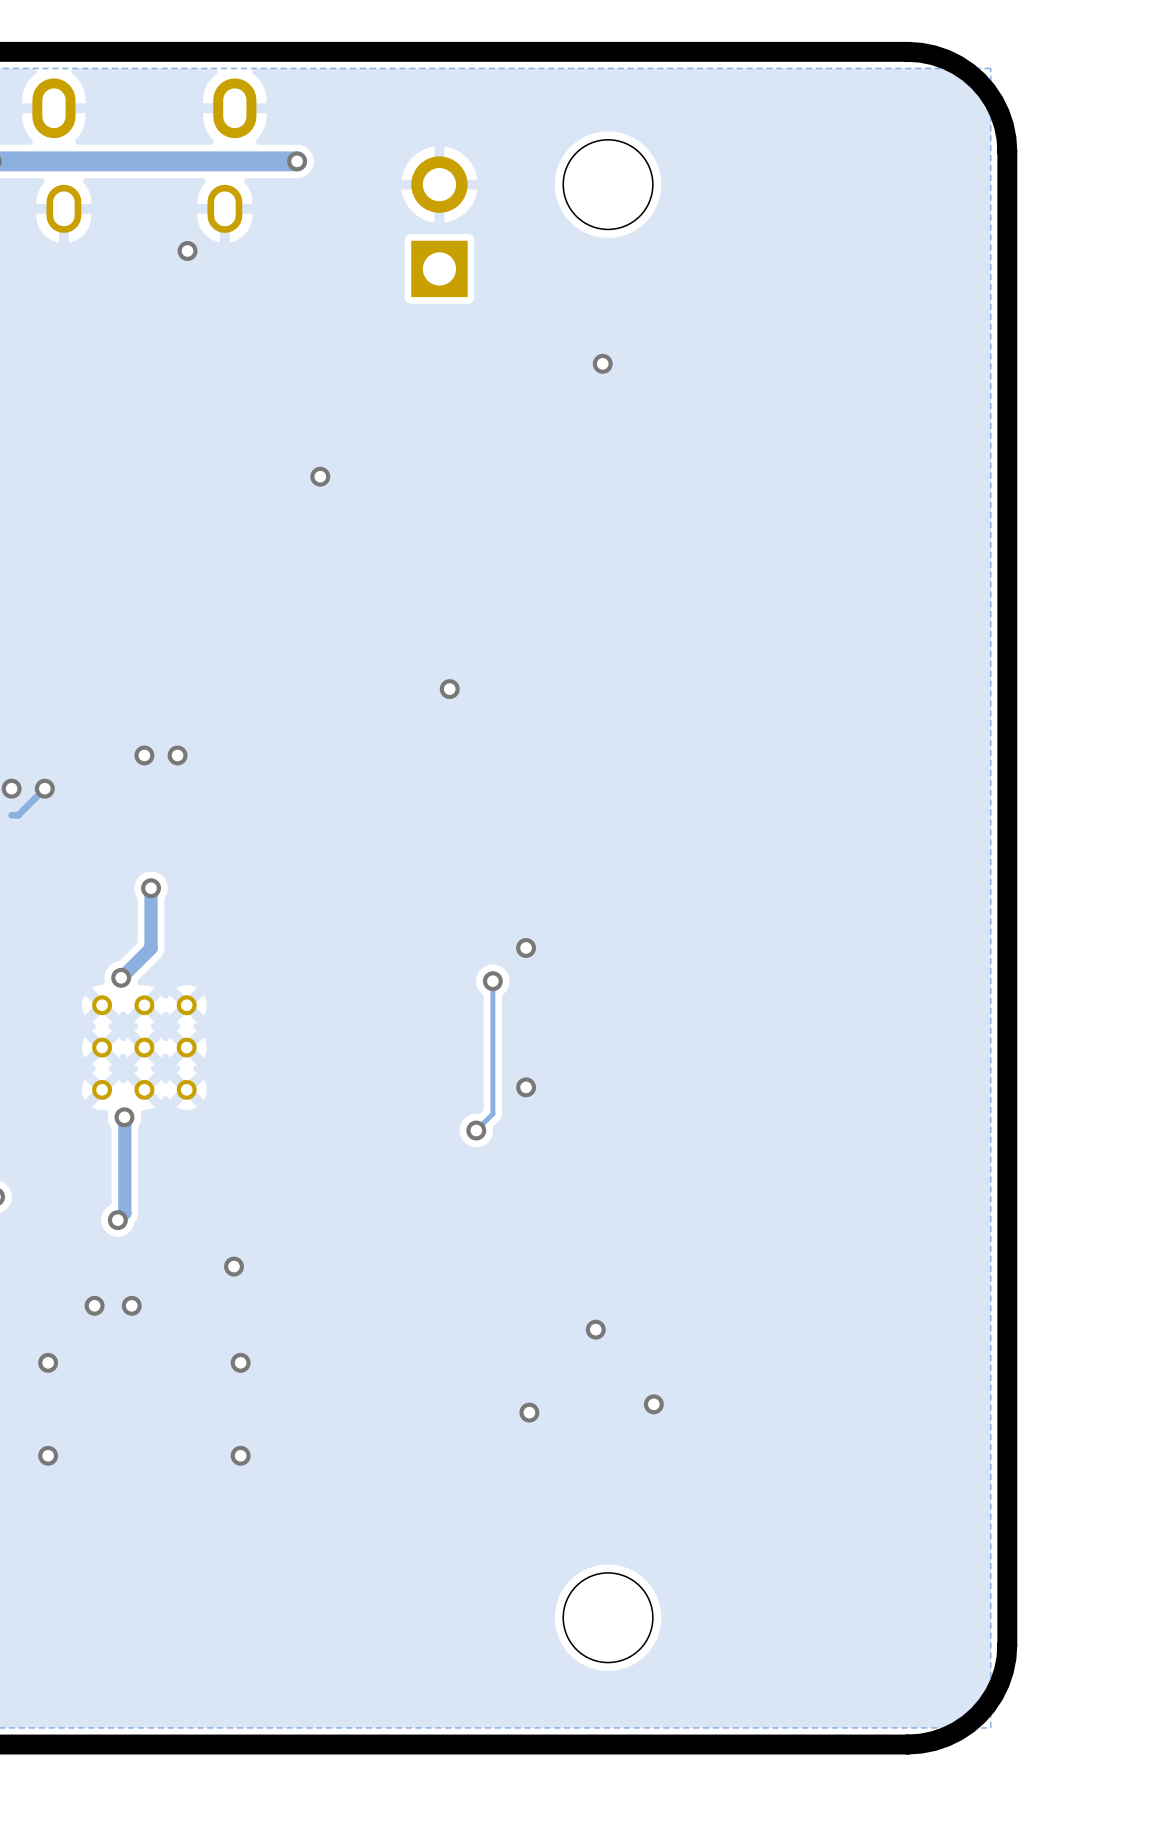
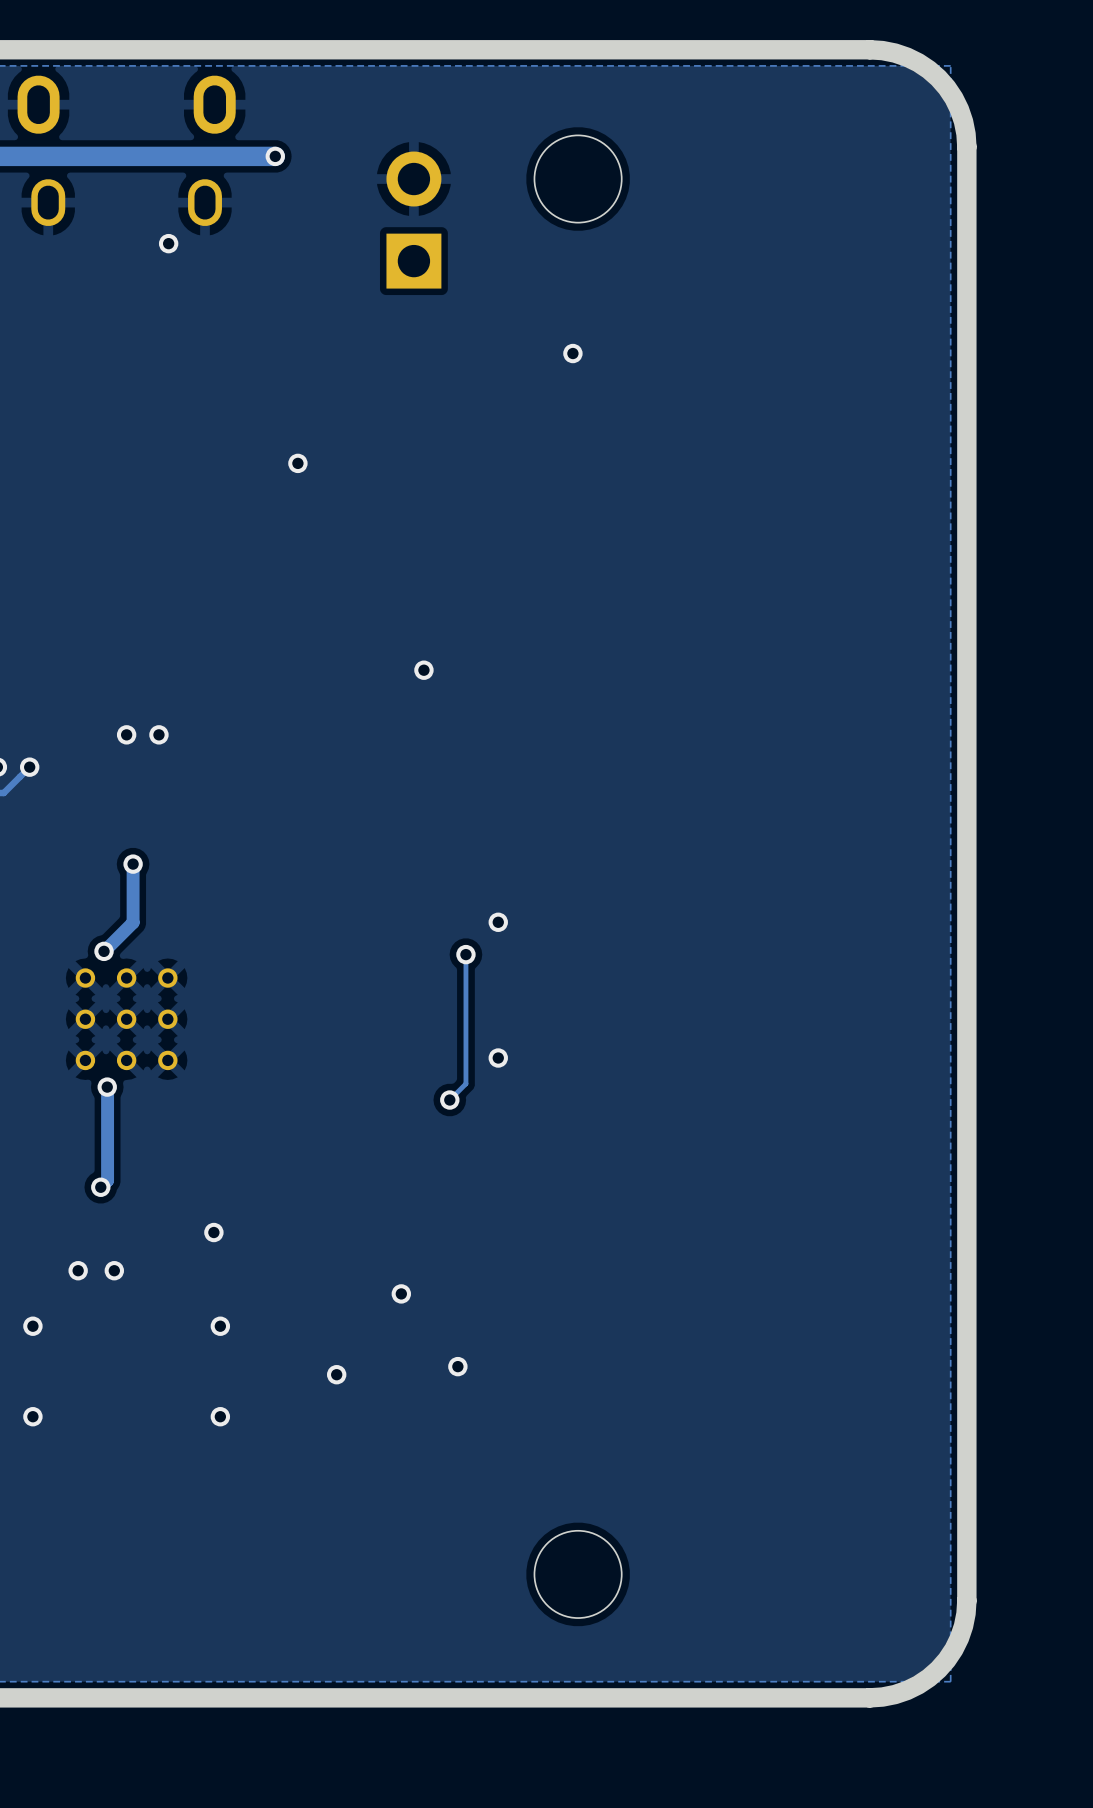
via: none -> (401, 1293)
via: (595, 1329) -> none
via: (653, 1404) -> none
via: none -> (336, 1374)
via position: (529, 1412) -> (457, 1366)

